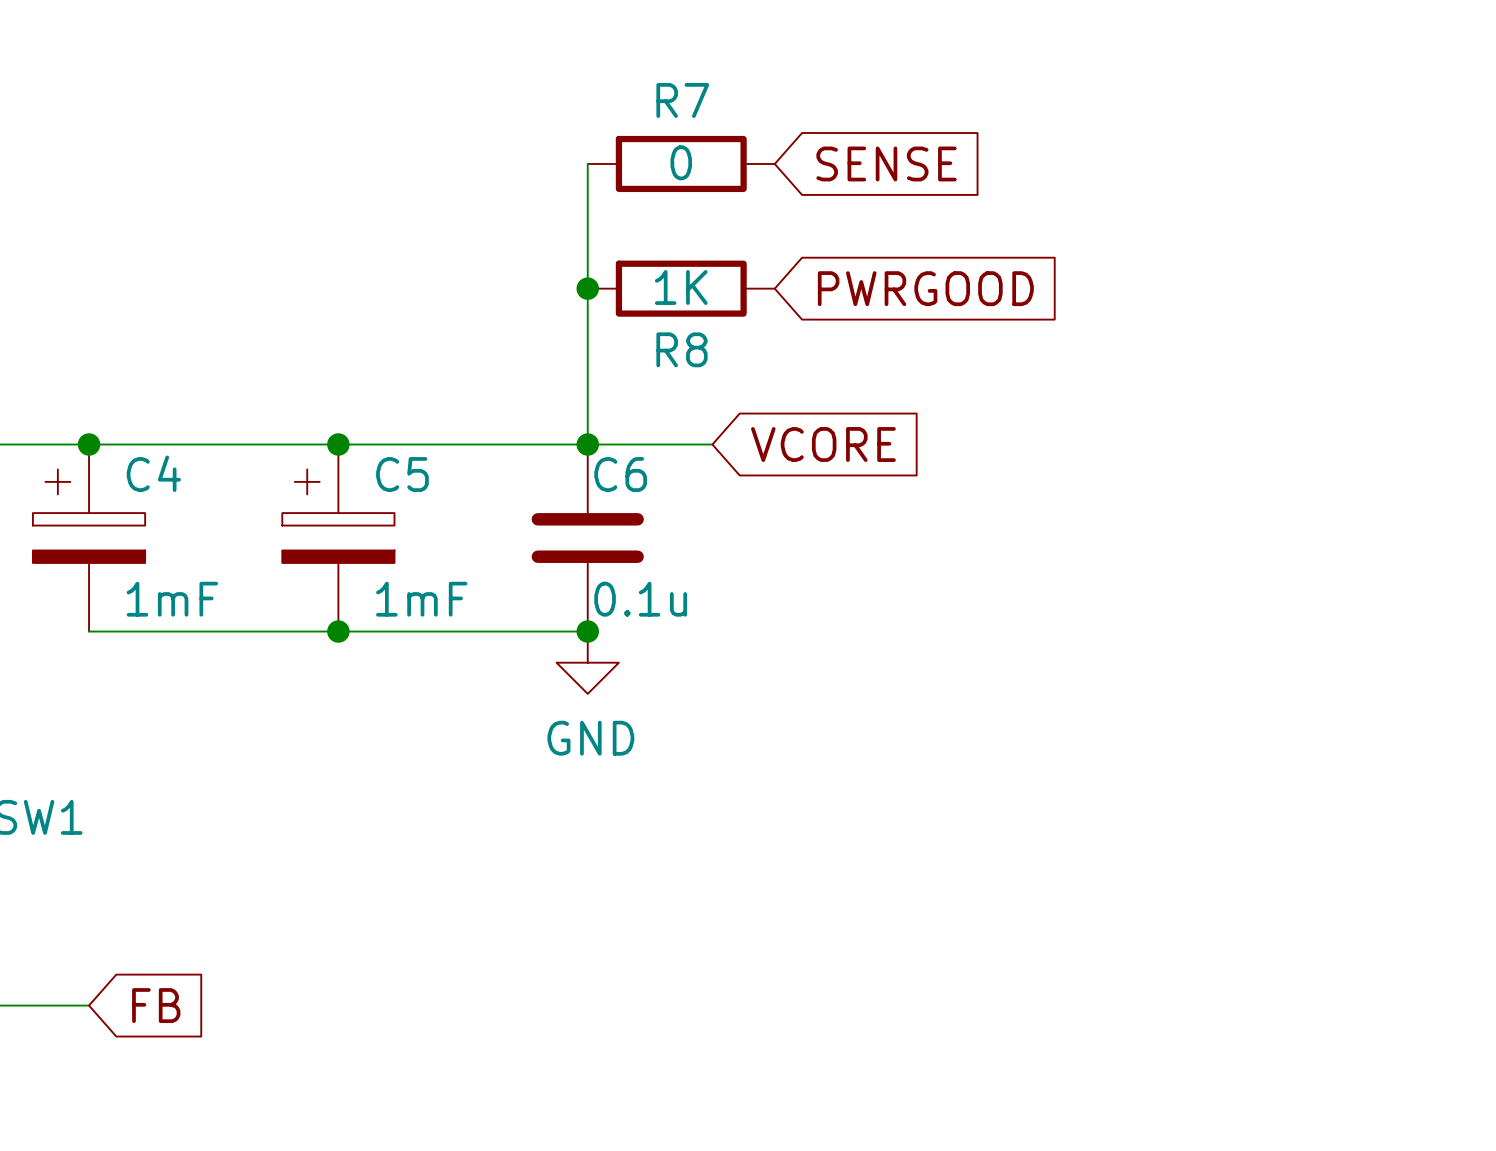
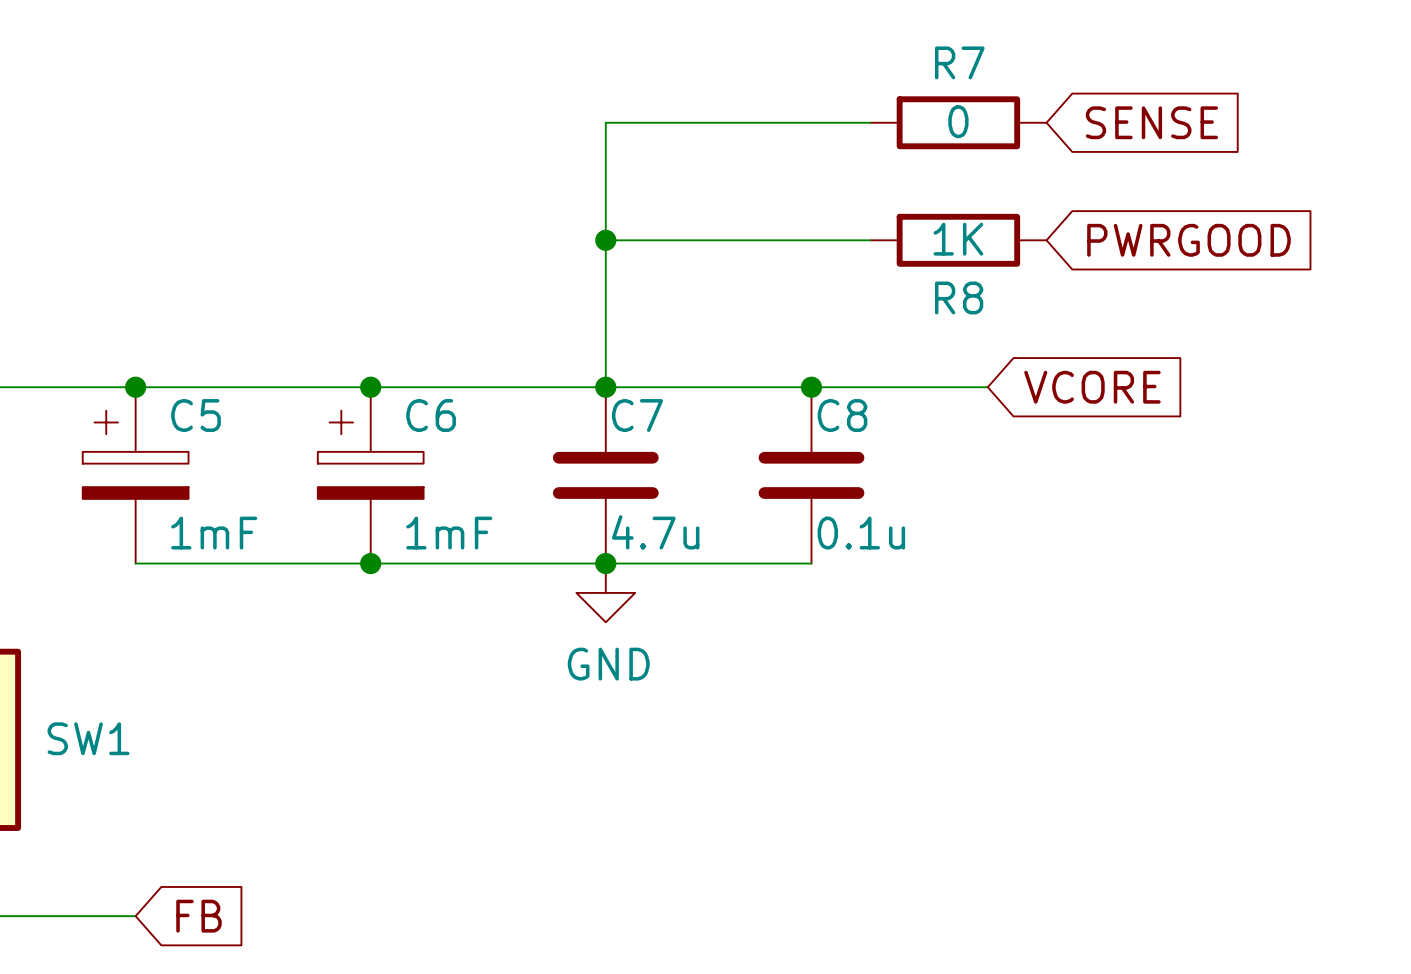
wire: none -> (605, 122) (870, 122)
R7 position: (681, 163) -> (958, 122)
global label position: SENSE (886, 163) -> SENSE (1151, 122)
wire: none -> (605, 240) (870, 240)
R8 position: (681, 288) -> (958, 240)
global label position: PWRGOOD (925, 288) -> PWRGOOD (1188, 240)
wire: none -> (723, 387) (987, 387)
junction: none -> (811, 387)
global label position: VCORE (823, 444) -> VCORE (1092, 387)
C4 name: C4 (153, 473) -> C5 (196, 415)
C5 name: C5 (402, 474) -> C6 (431, 415)
C6 name: C6 (620, 474) -> C7 (637, 415)
C8: none -> 0.1u (811, 475)
C6 value: 0.1u (640, 599) -> 4.7u (655, 532)
wire: none -> (605, 563) (811, 563)

